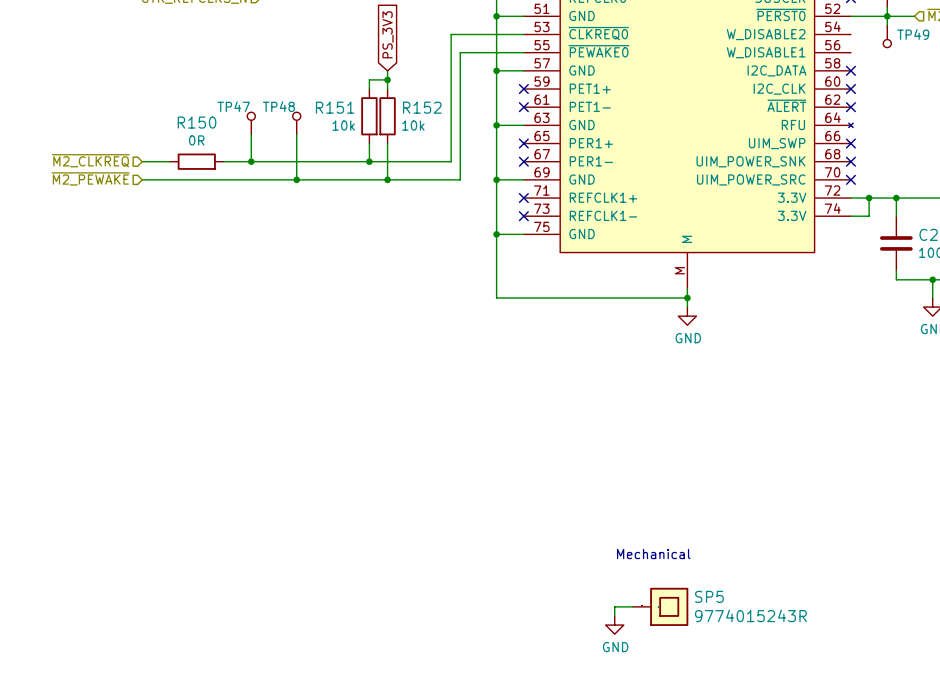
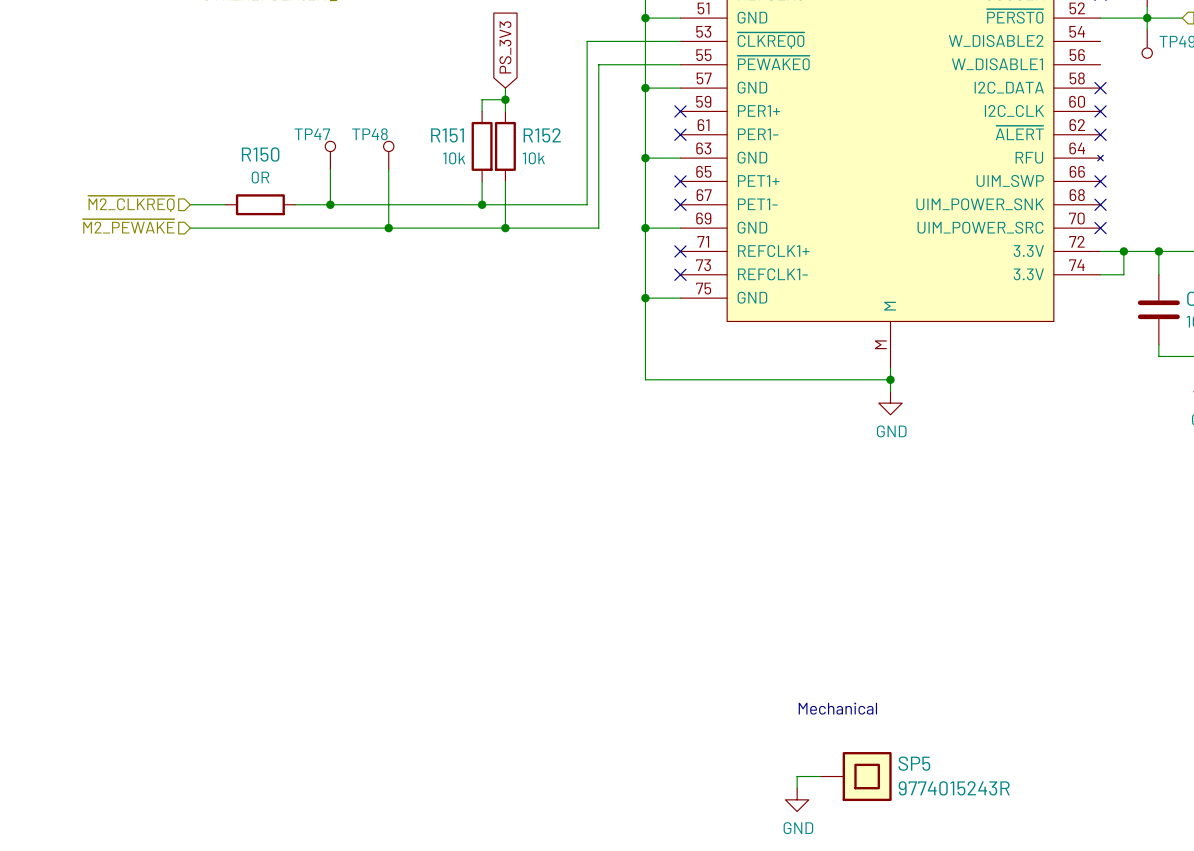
part pin name: PET1+ (590, 88) -> PER1+ (759, 110)
part pin name: PET1- (590, 106) -> PER1- (758, 134)
part pin name: PER1+ (591, 143) -> PET1+ (758, 180)
part pin name: PER1- (591, 161) -> PET1- (757, 204)

